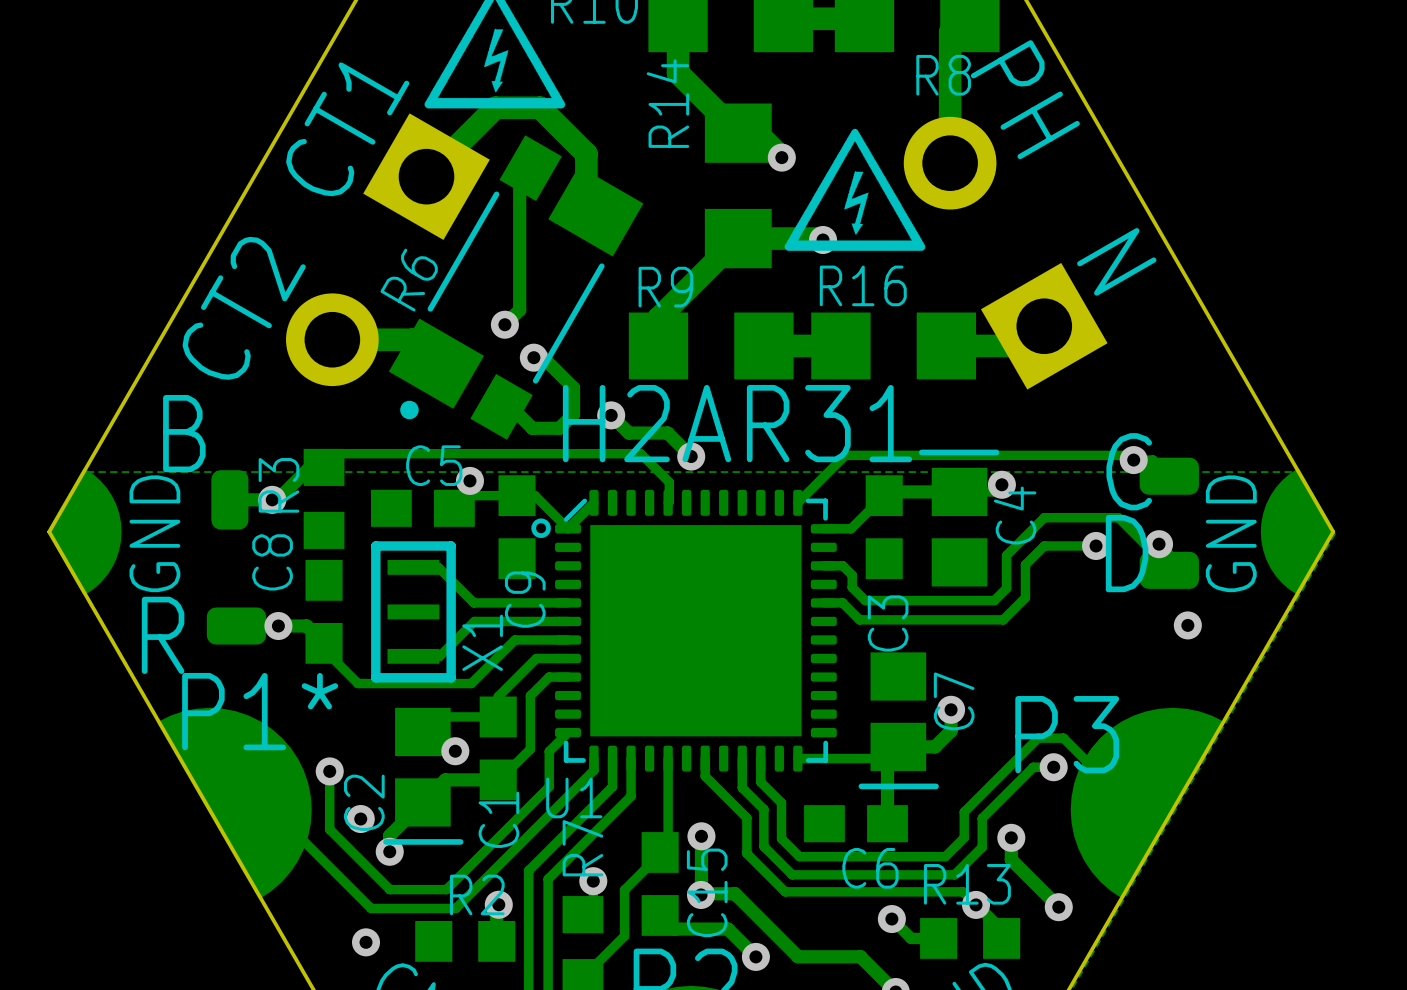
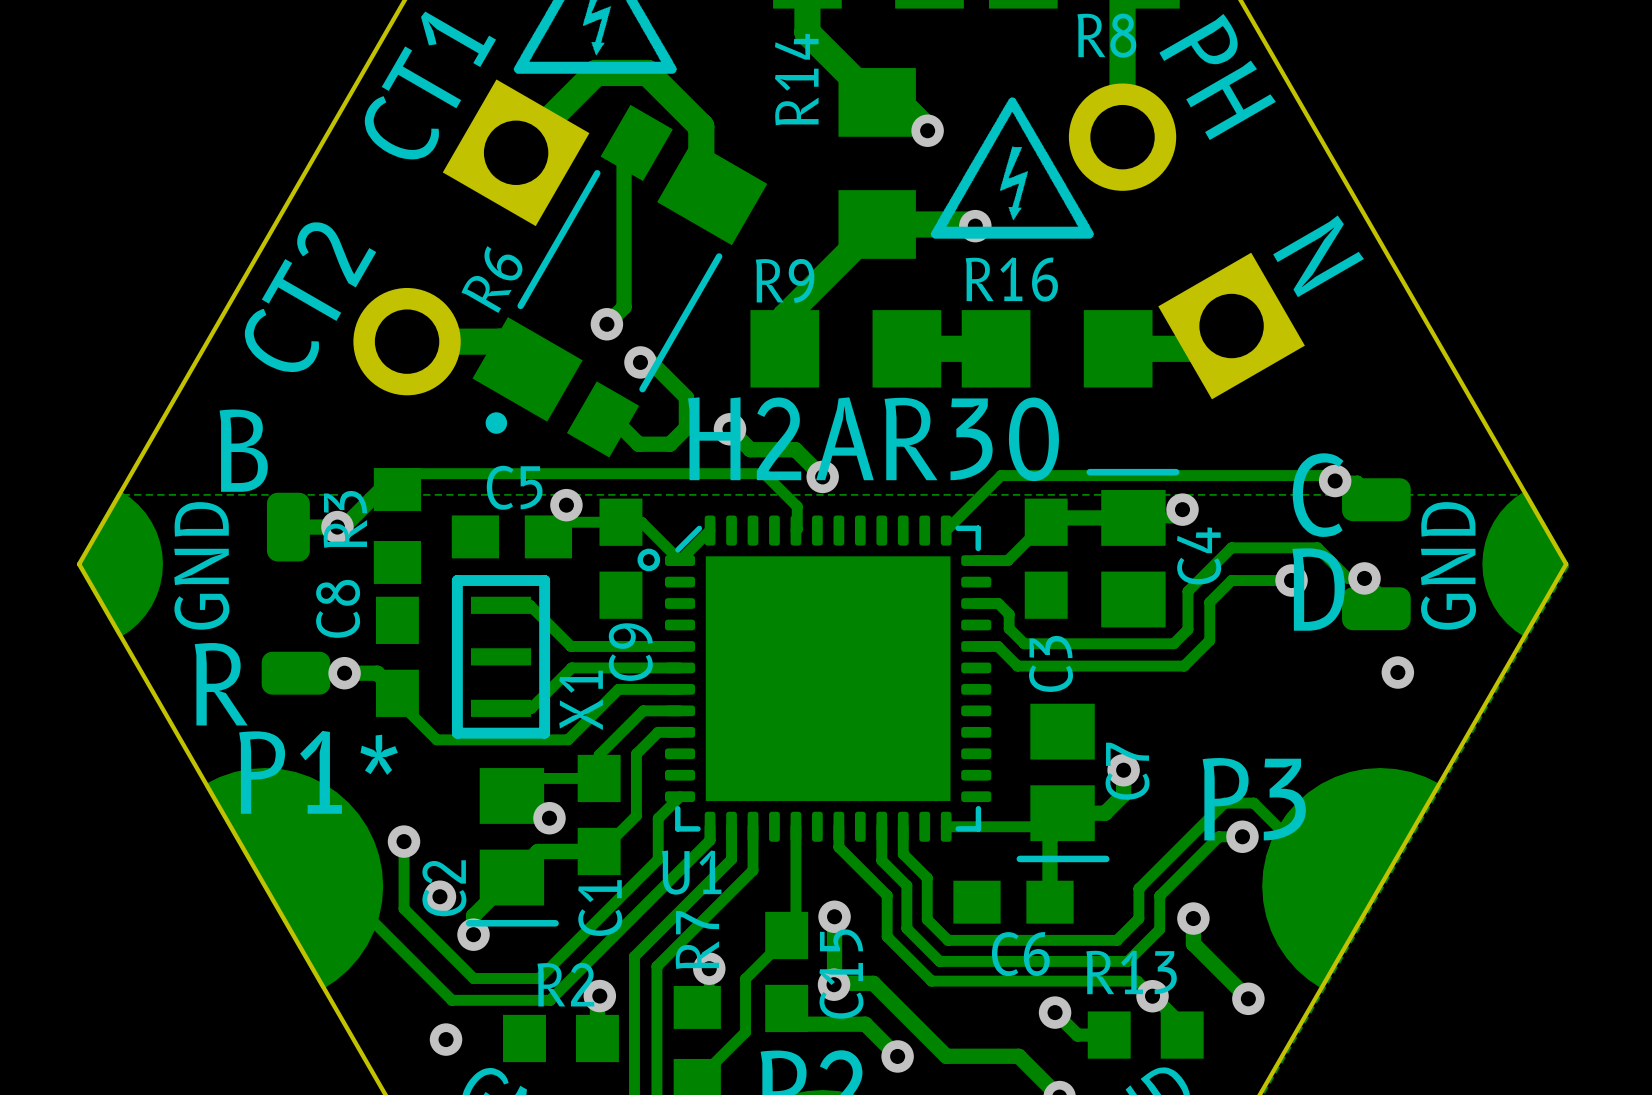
text: H2AR31 (737, 423) -> H2AR30 (873, 439)

